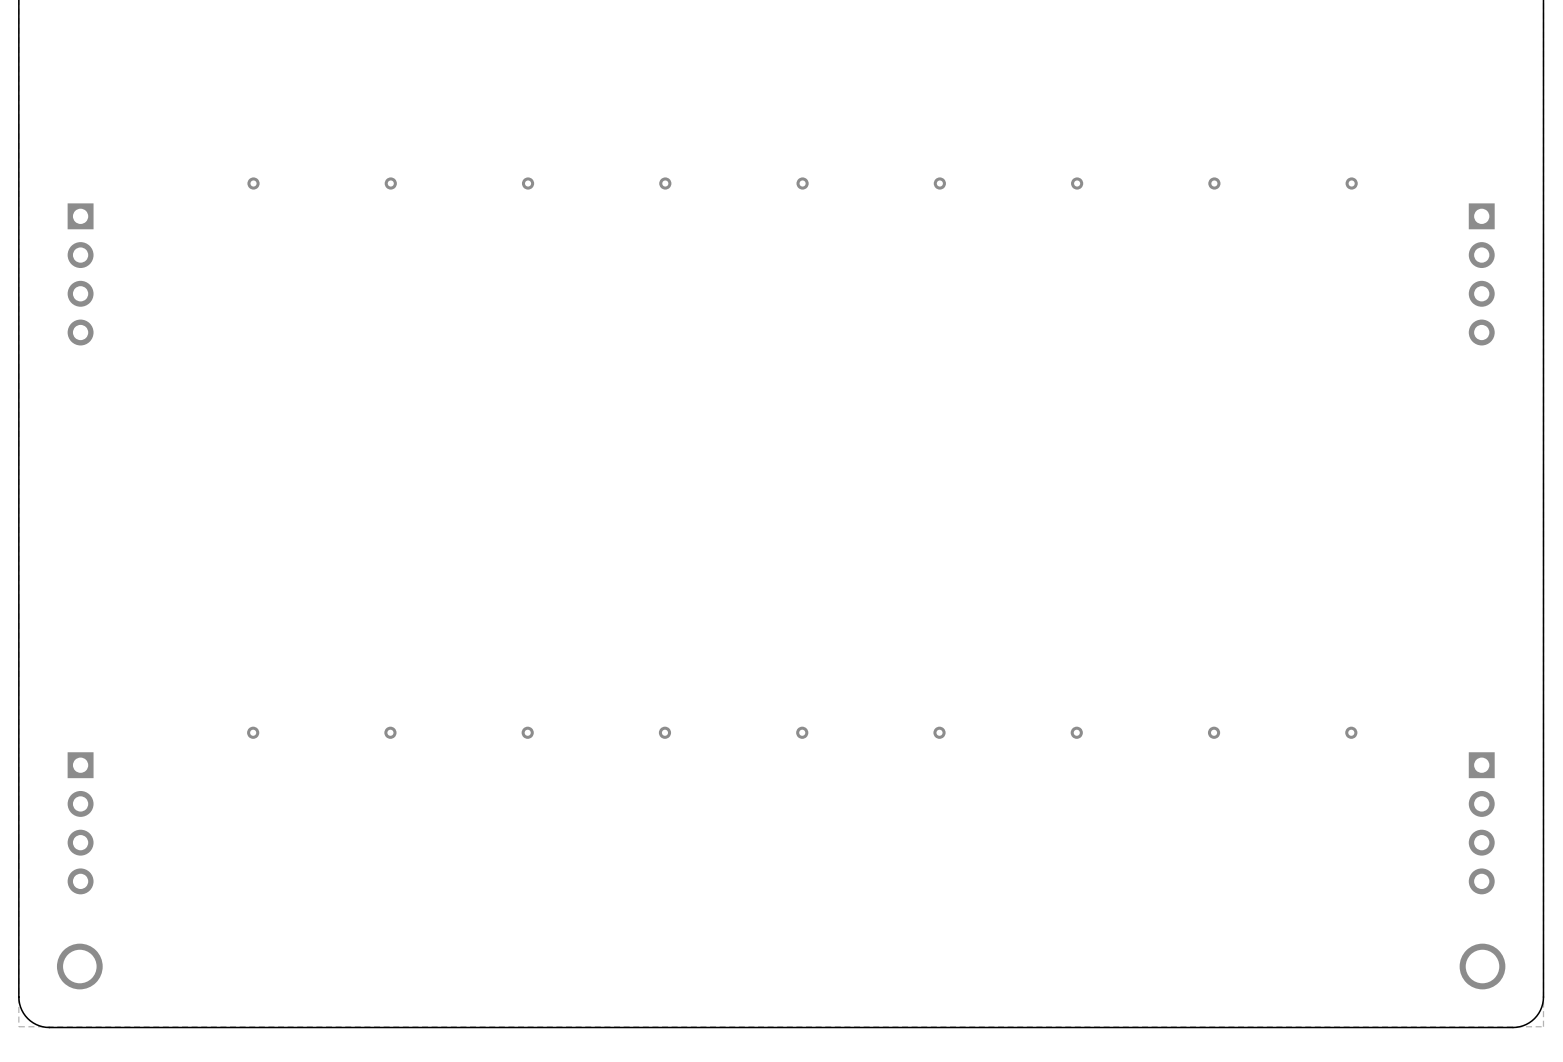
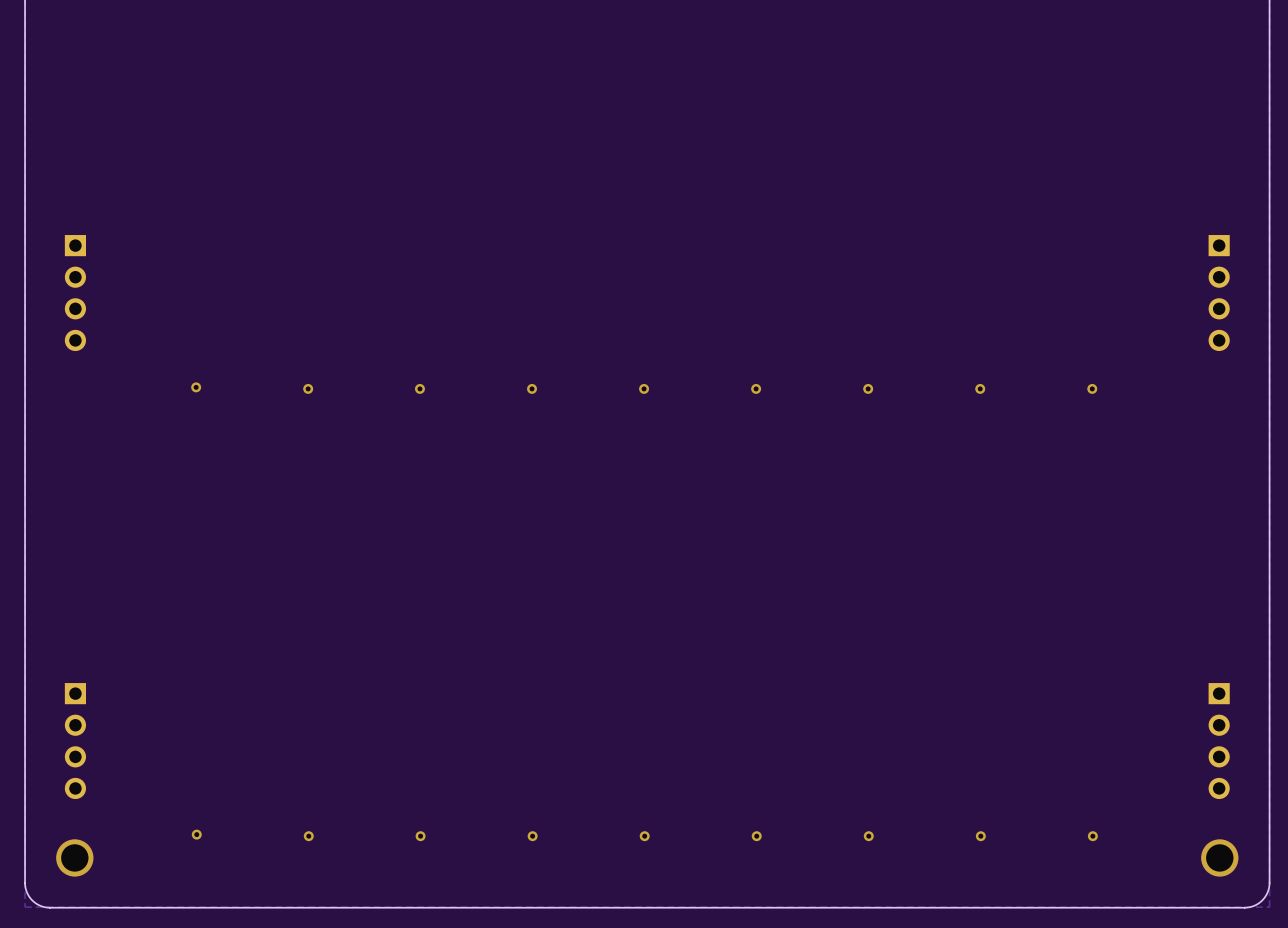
via: (253, 183) -> none
via: (390, 183) -> none
via: (528, 183) -> none
via: (665, 183) -> none
via: (802, 183) -> none
via: (939, 183) -> none
via: (1077, 183) -> none
via: (1214, 183) -> none
via: (1351, 183) -> none
via: none -> (196, 387)
via: none -> (308, 388)
via: none -> (419, 388)
via: none -> (532, 388)
via: none -> (644, 388)
via: none -> (756, 388)
via: none -> (868, 388)
via: none -> (980, 388)
via: none -> (1092, 388)
via: (253, 732) -> none
via: (390, 732) -> none
via: (527, 732) -> none
via: (664, 732) -> none
via: (802, 732) -> none
via: (939, 732) -> none
via: (1076, 732) -> none
via: (1214, 732) -> none
via: (1351, 732) -> none
via: none -> (196, 834)
via: none -> (308, 836)
via: none -> (420, 836)
via: none -> (532, 836)
via: none -> (644, 836)
via: none -> (756, 836)
via: none -> (868, 836)
via: none -> (980, 836)
via: none -> (1092, 836)

